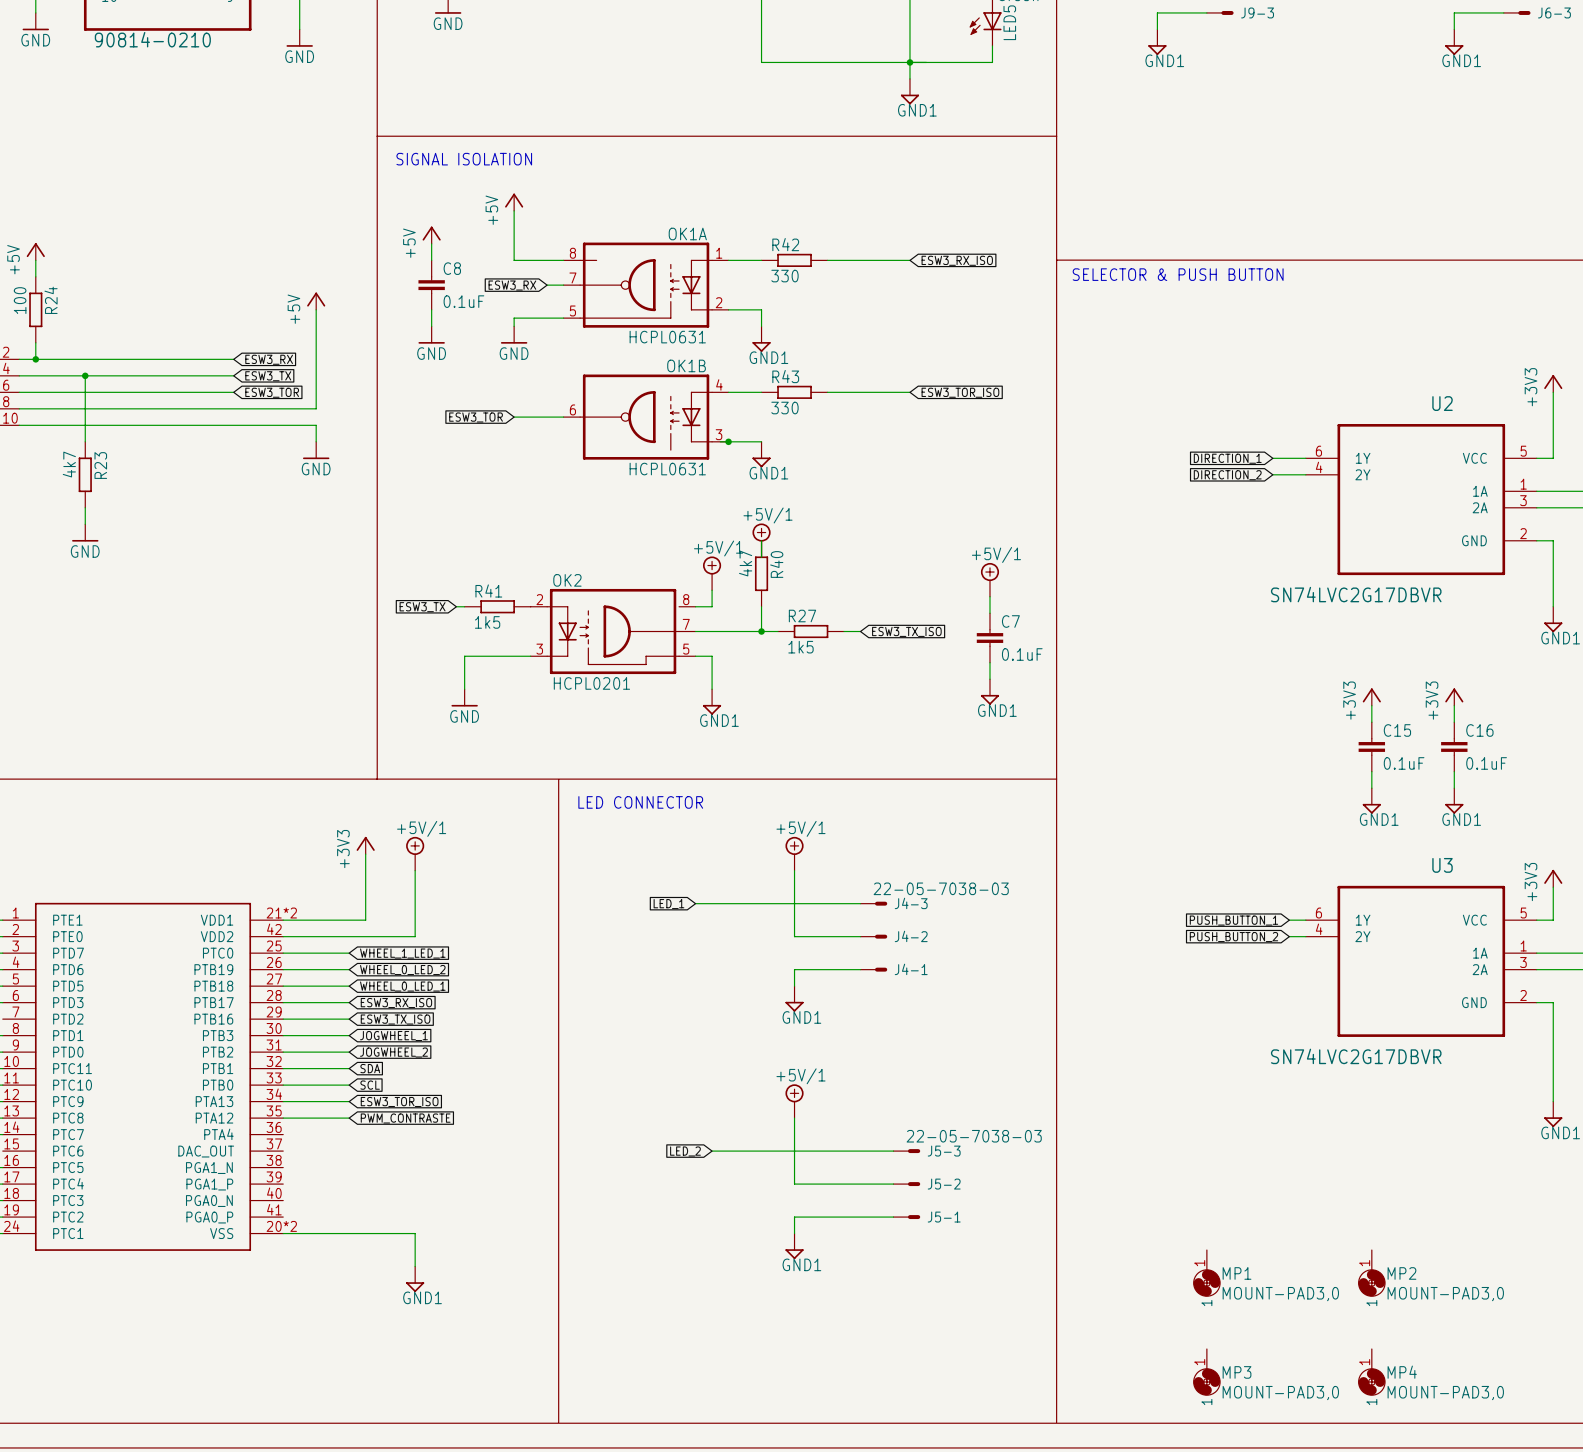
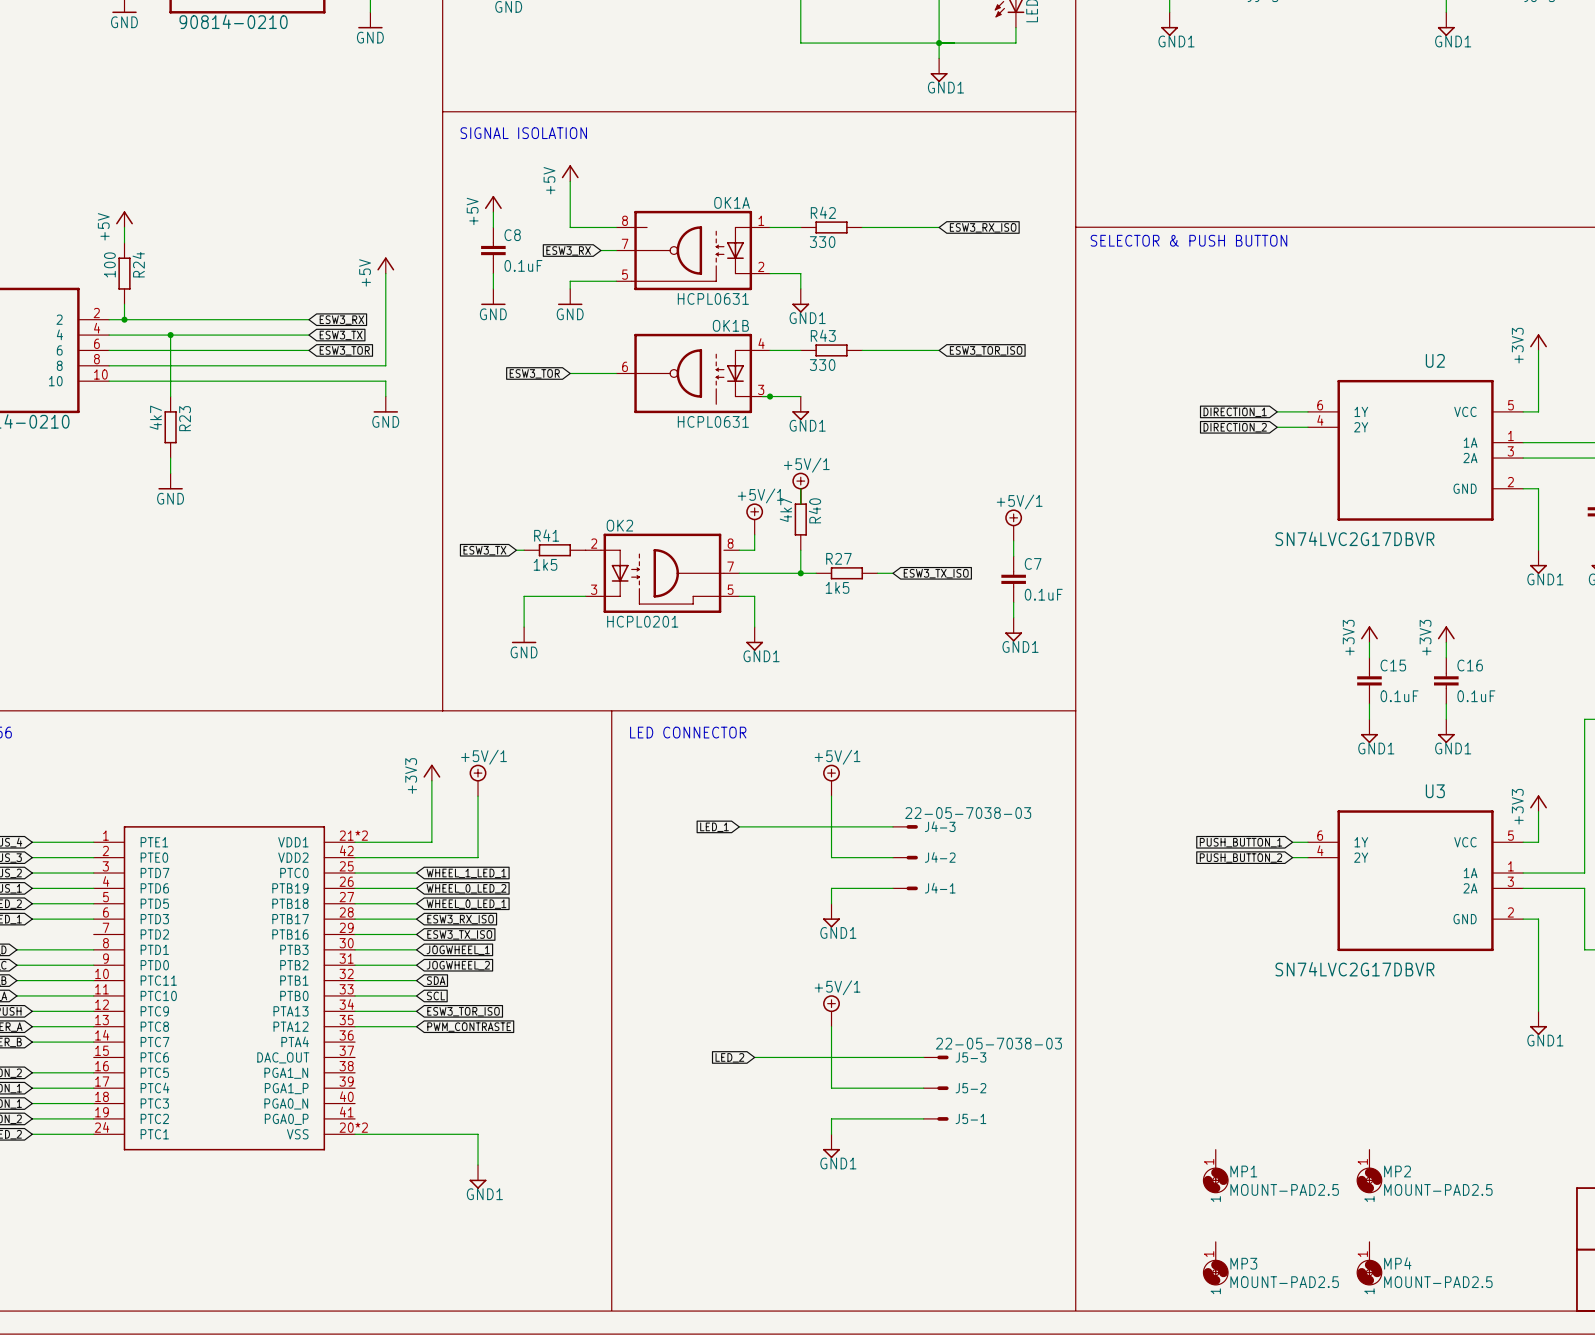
MP1 value: MOUNT-PAD3,0 (1280, 1294) -> MOUNT-PAD2.5 (1284, 1189)
MP2 value: MOUNT-PAD3,0 (1445, 1294) -> MOUNT-PAD2.5 (1438, 1189)
MP3 value: MOUNT-PAD3,0 (1280, 1393) -> MOUNT-PAD2.5 (1284, 1282)
MP4 value: MOUNT-PAD3,0 (1445, 1393) -> MOUNT-PAD2.5 (1438, 1282)

